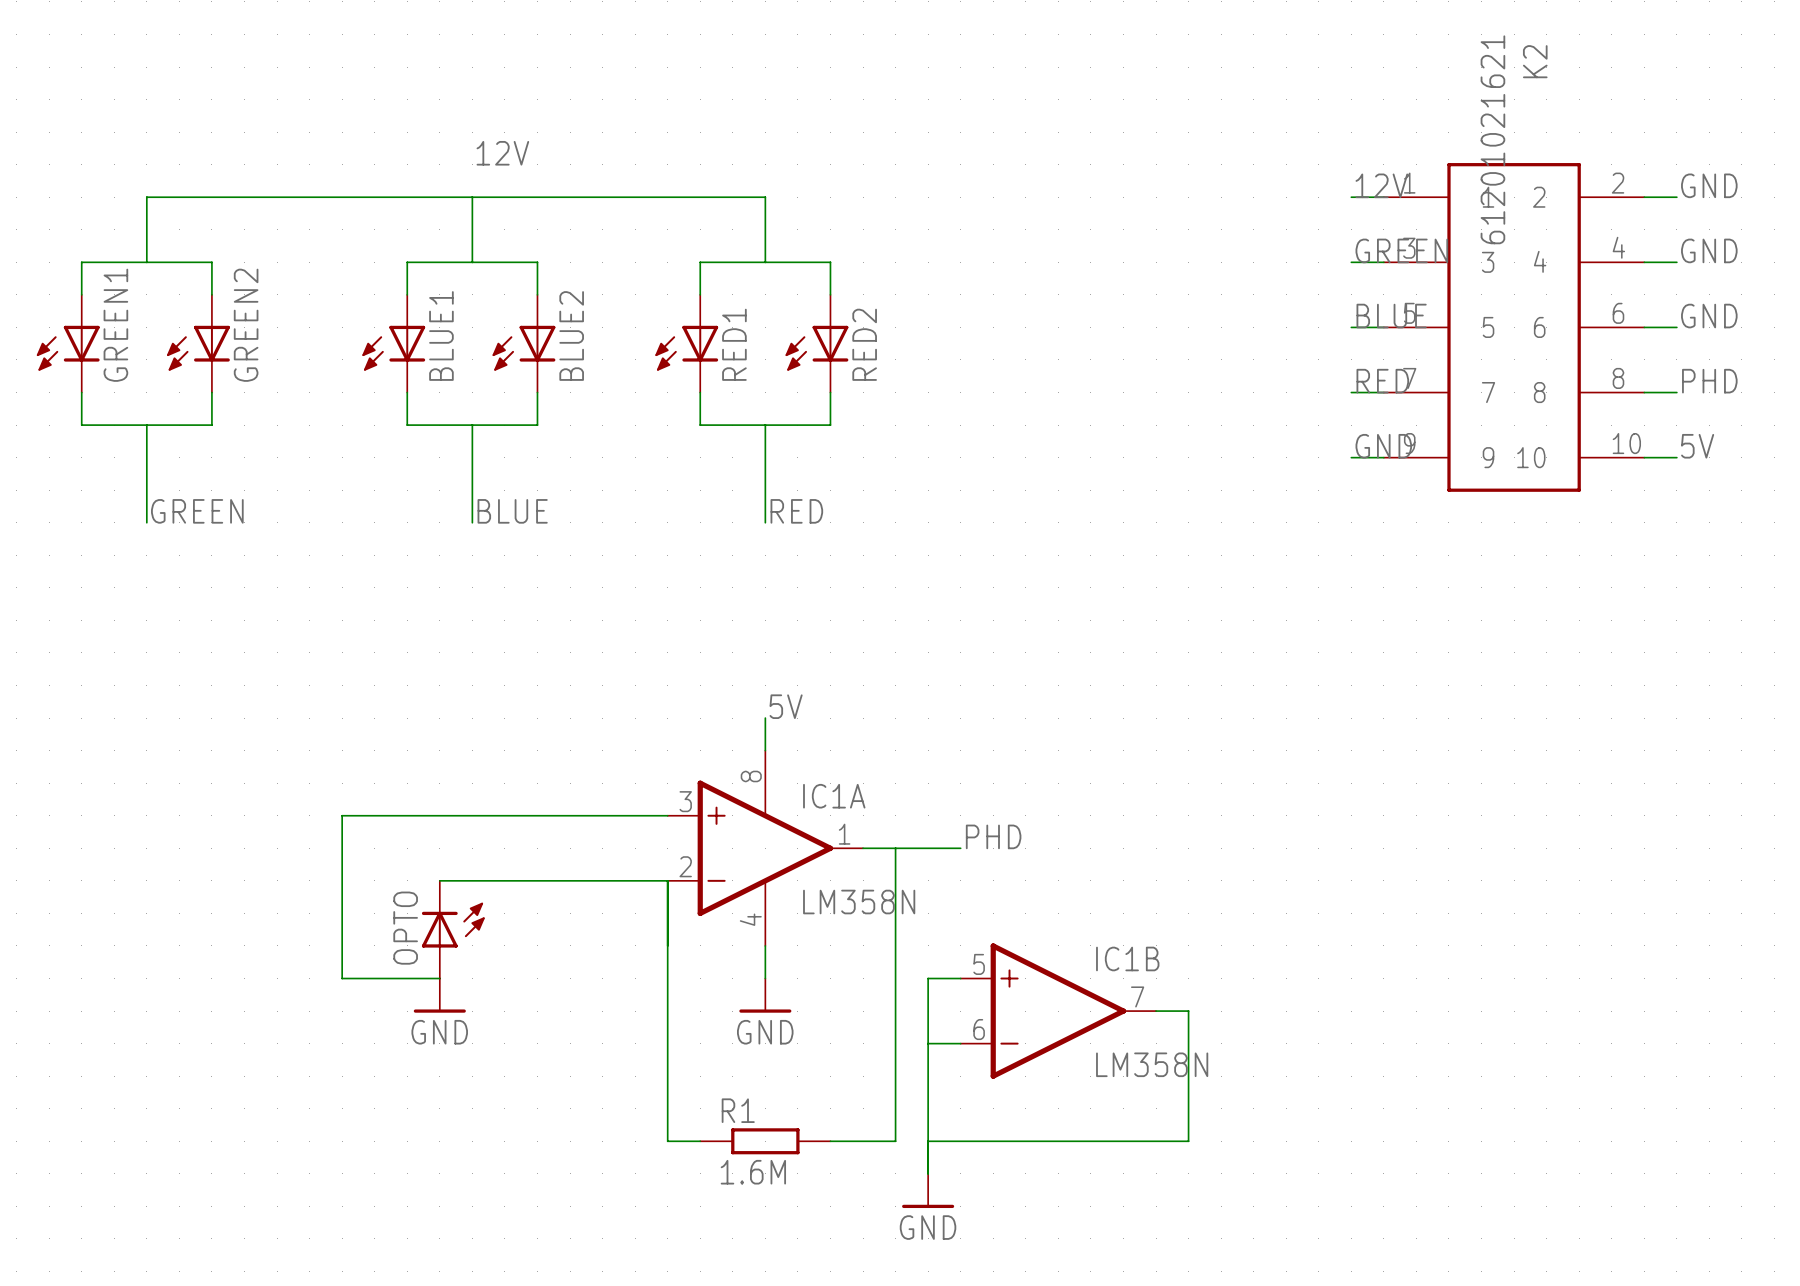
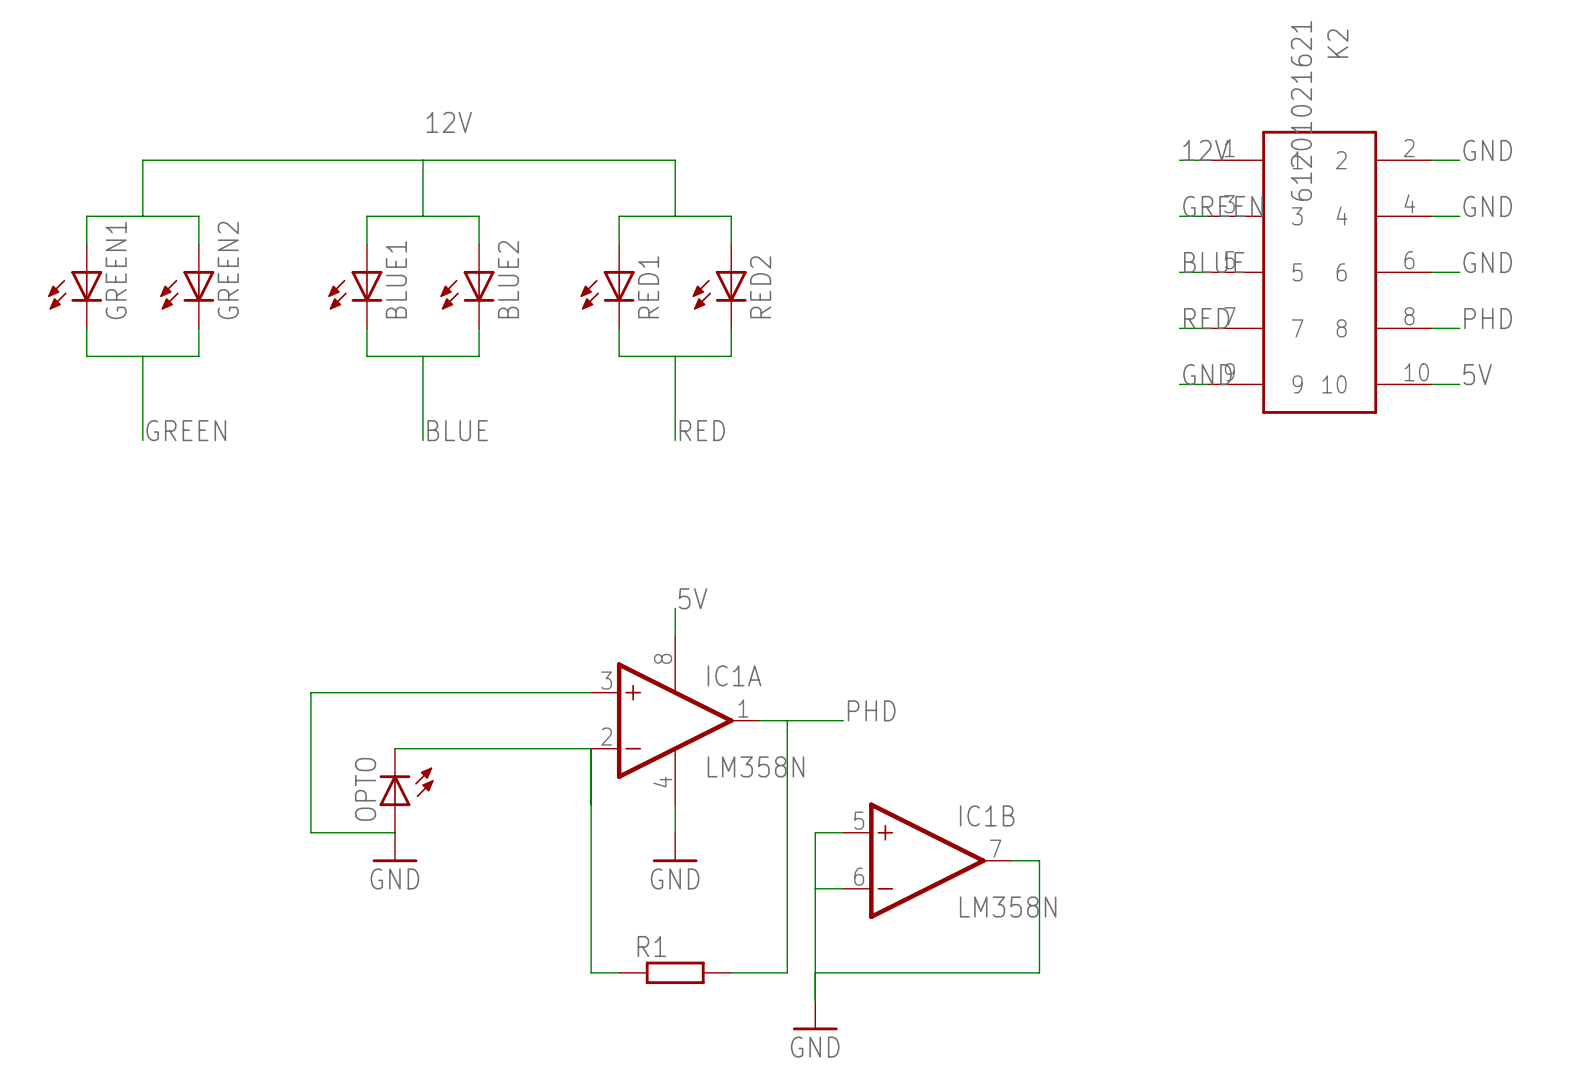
R1 value: 1.6M (753, 1172) -> none

